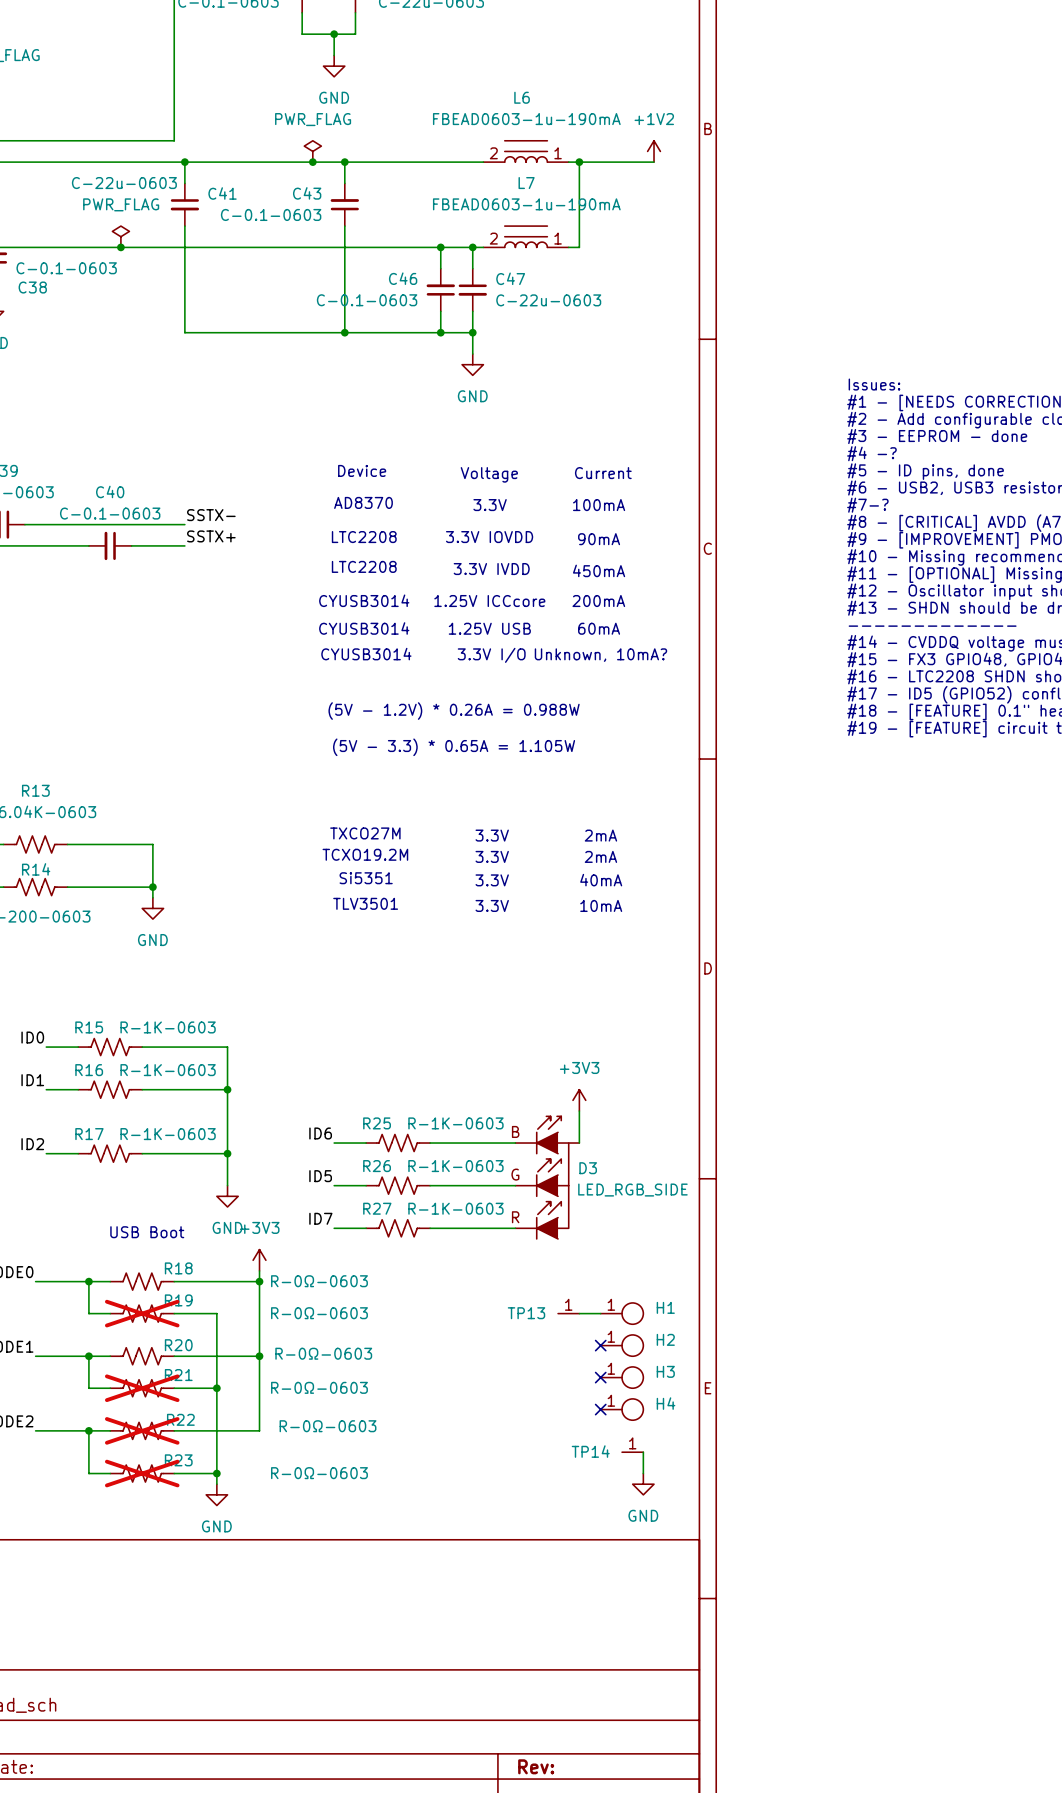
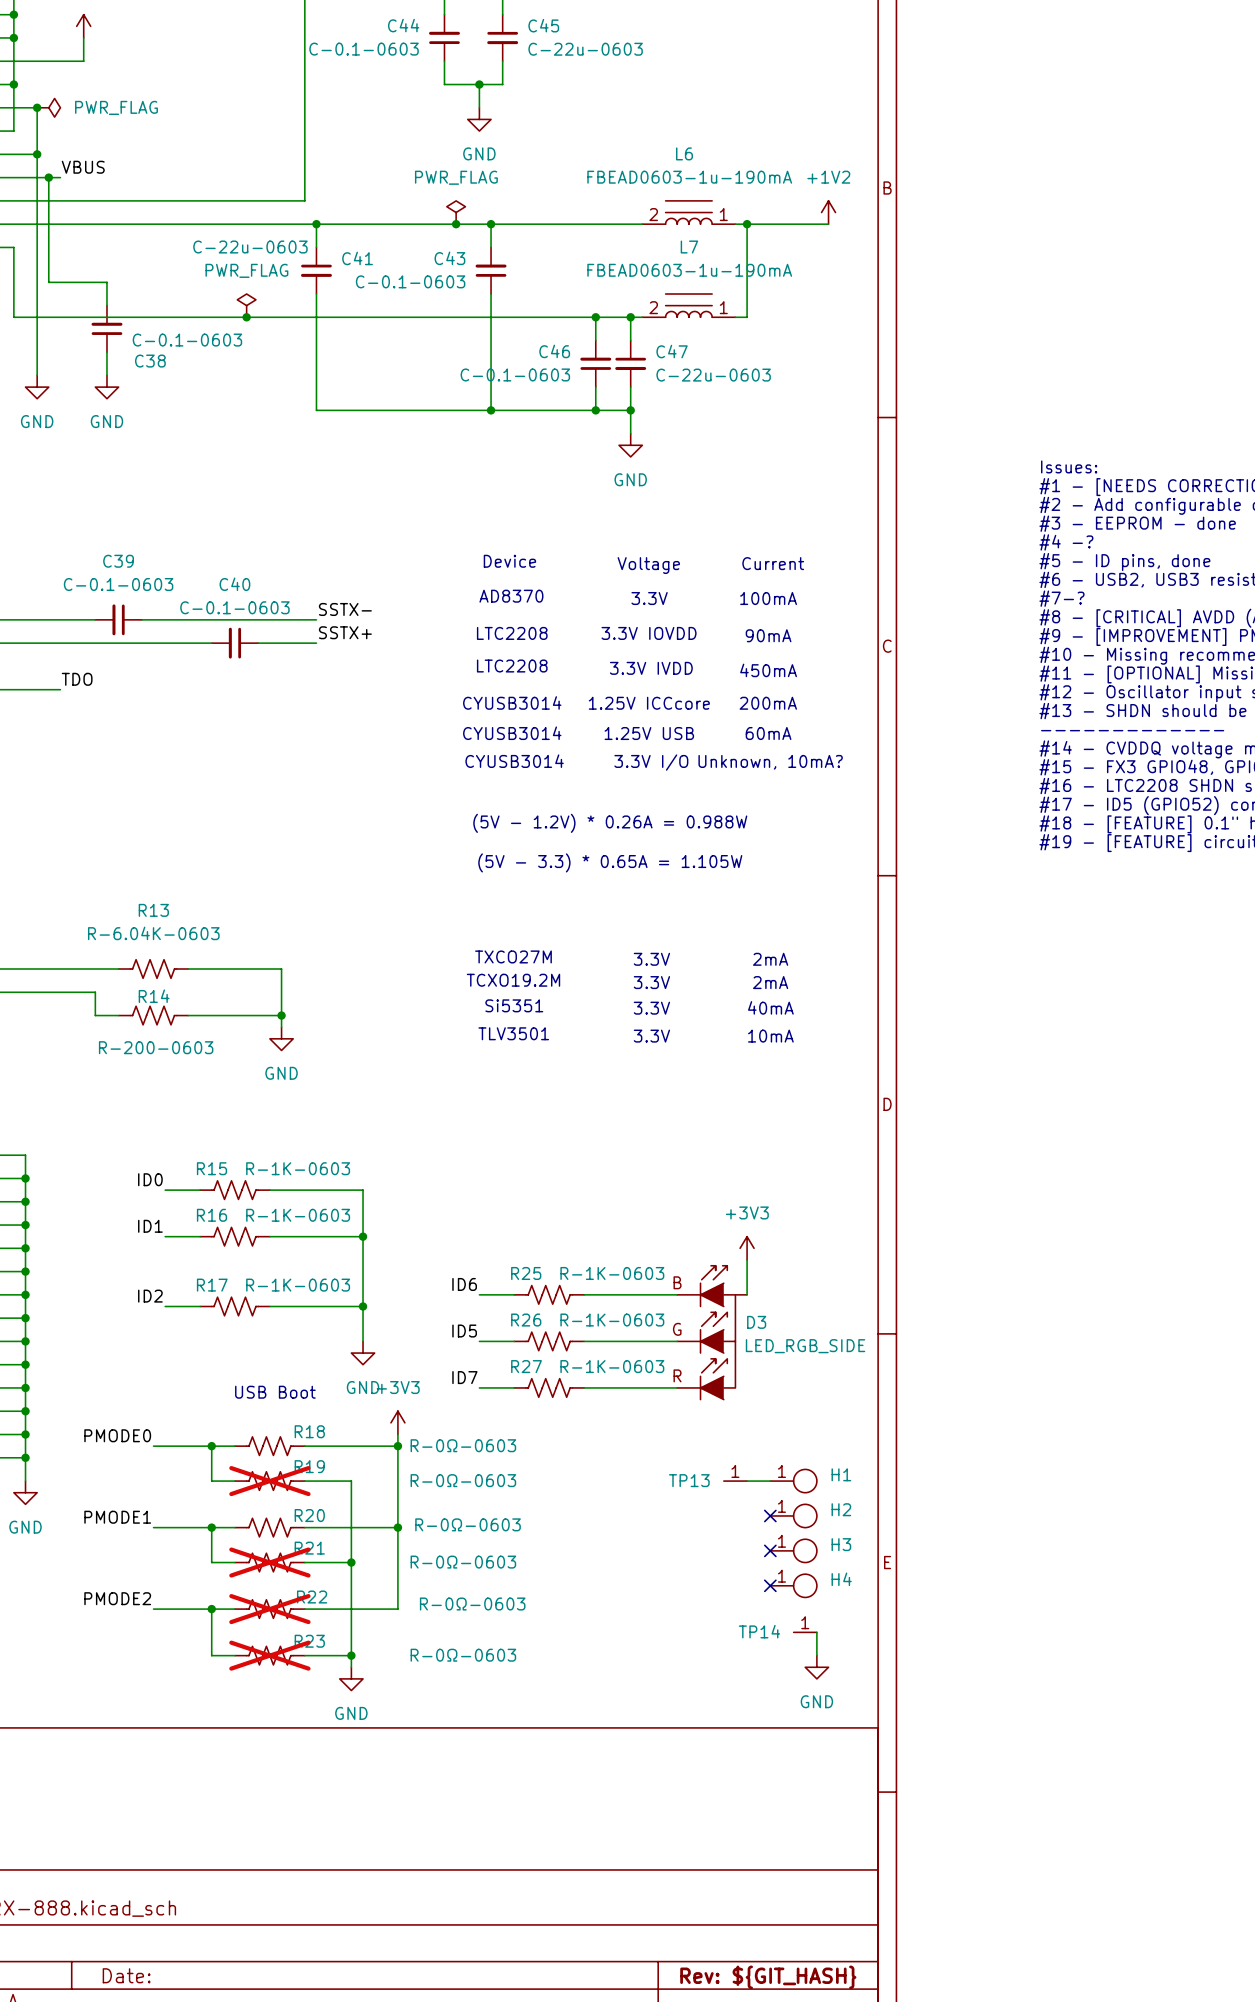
title block: Rev: (536, 1766) -> Rev: ${GIT_HASH} (768, 1977)

